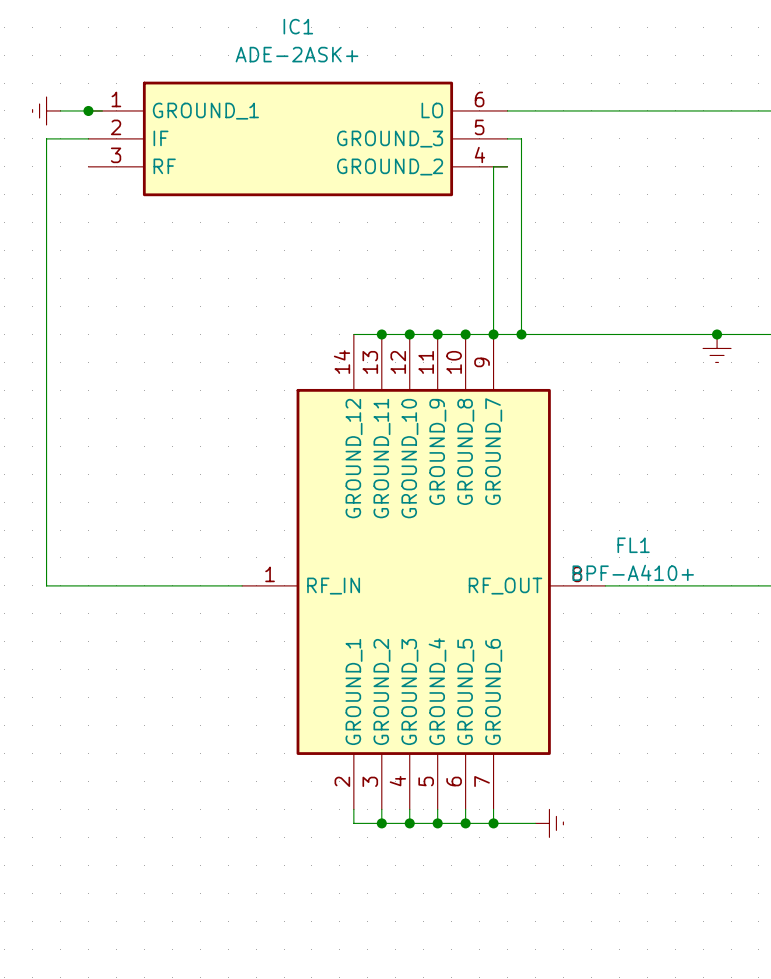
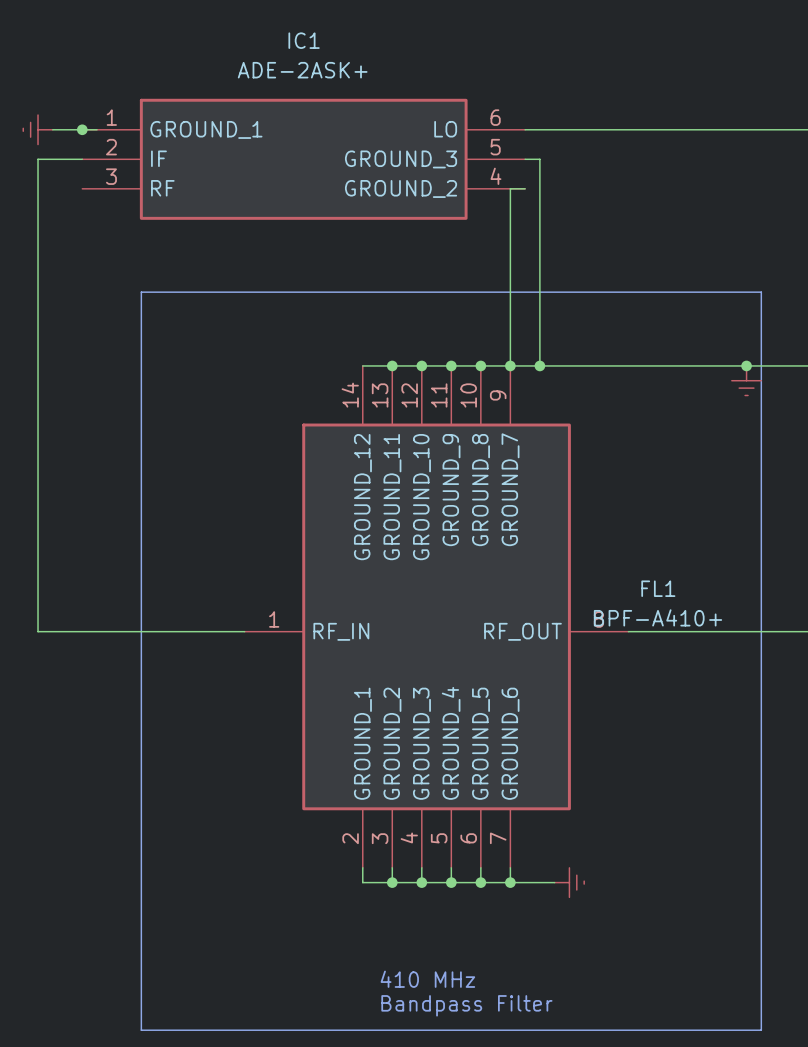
line: none -> (141, 292) (761, 292) (761, 1030) (141, 1030) (141, 292)
text: none -> 410 MHz (427, 979)
text: none -> Bandpass Filter (466, 1005)

